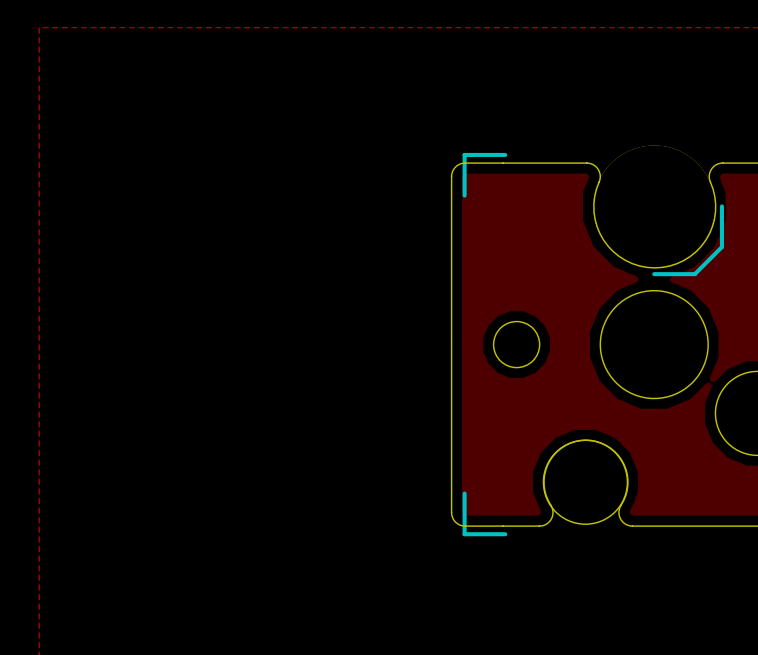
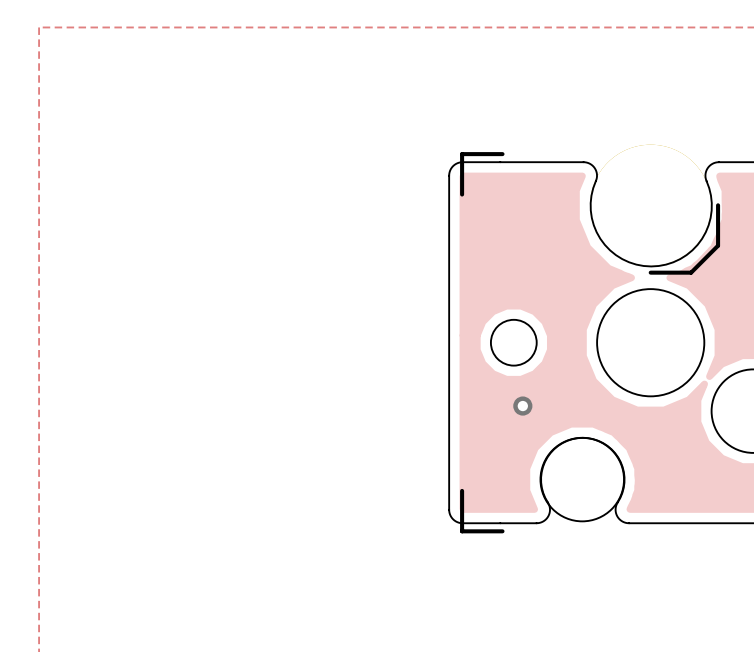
via: none -> (522, 406)

